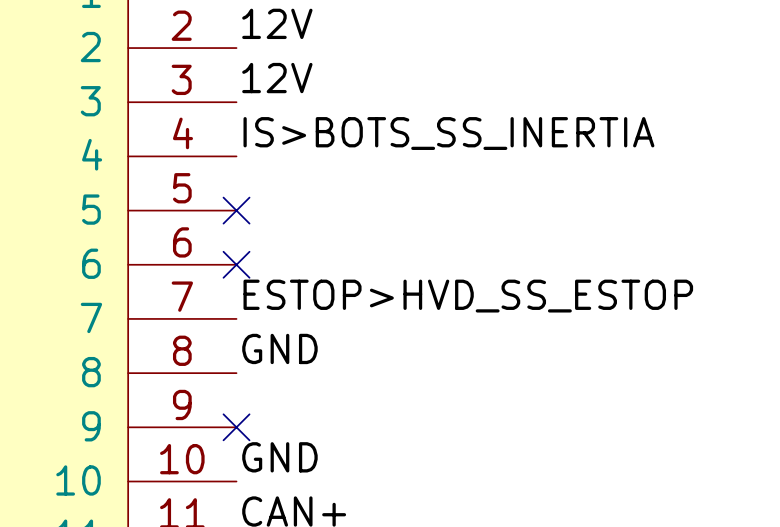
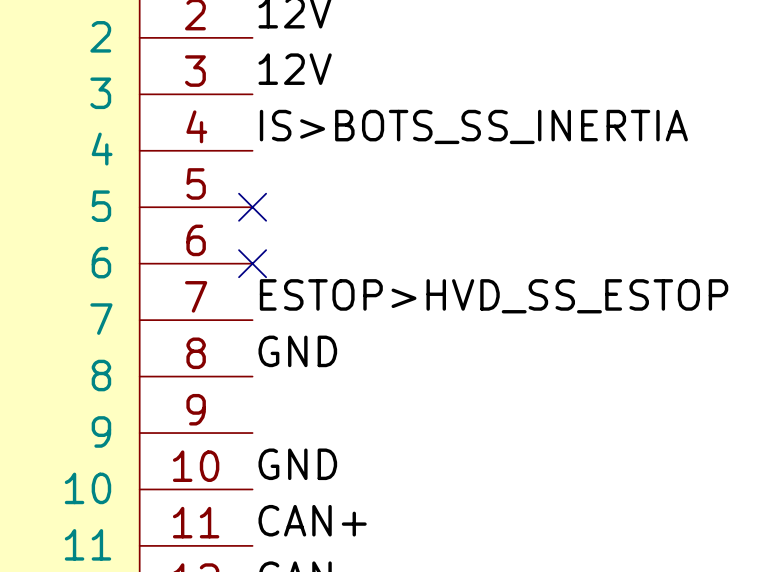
no-connect mark: (236, 427) -> none

